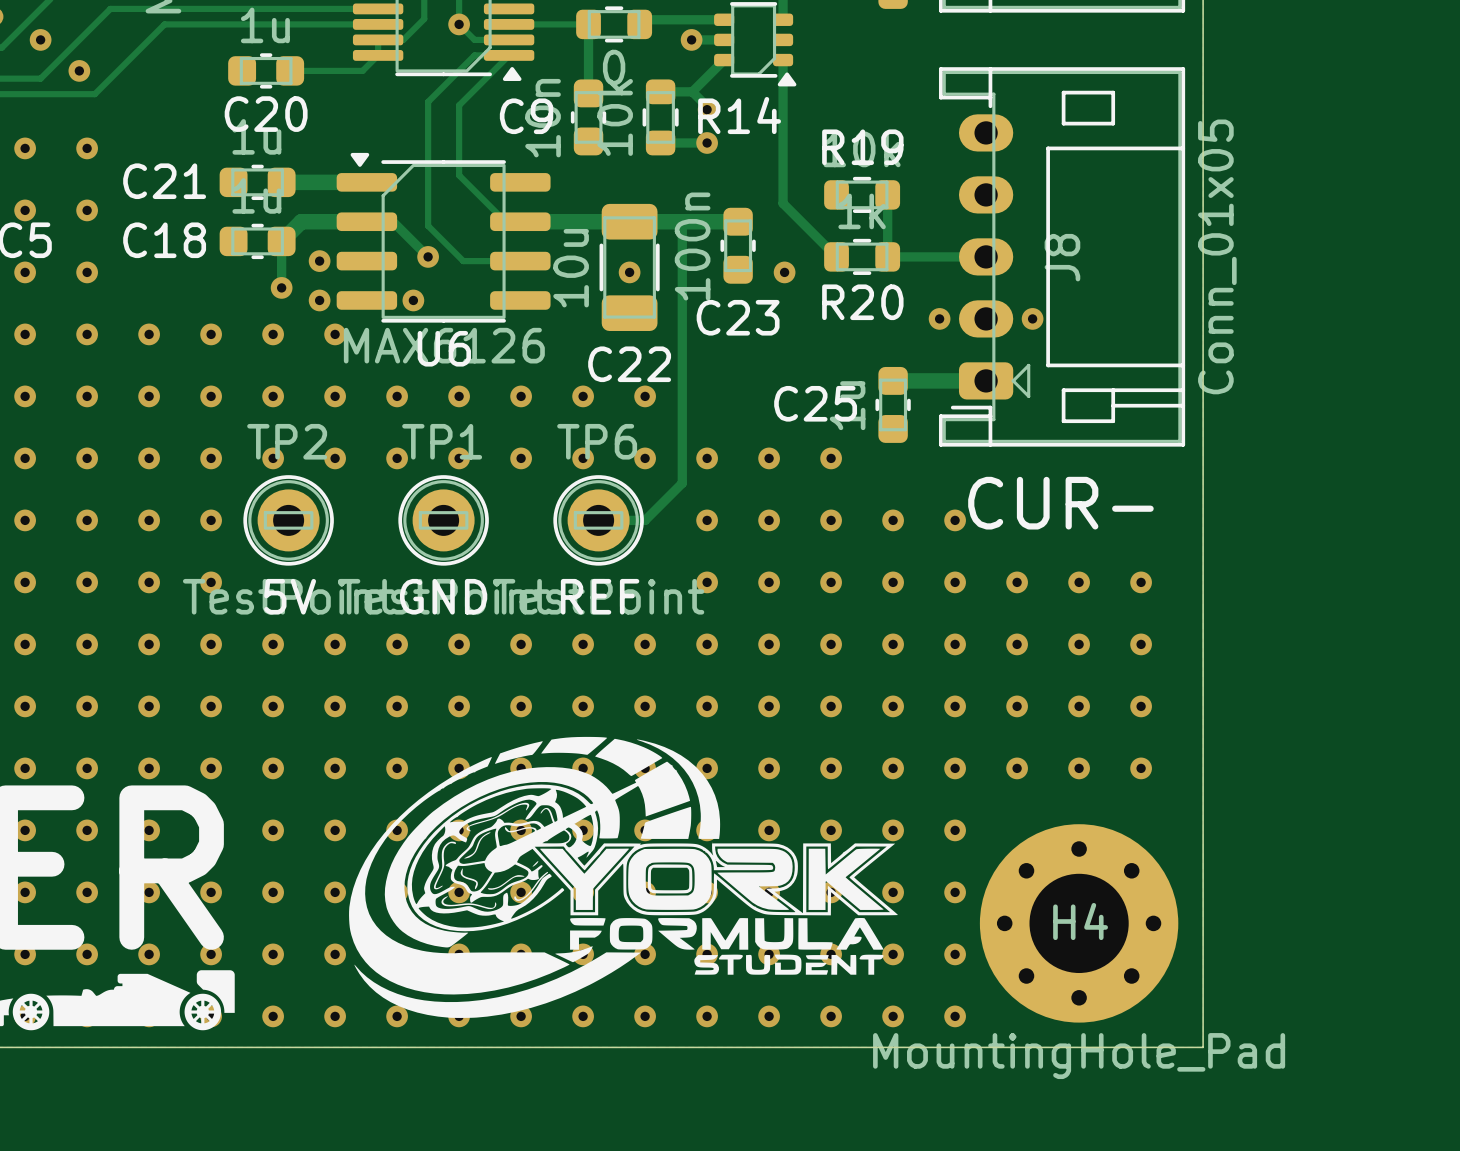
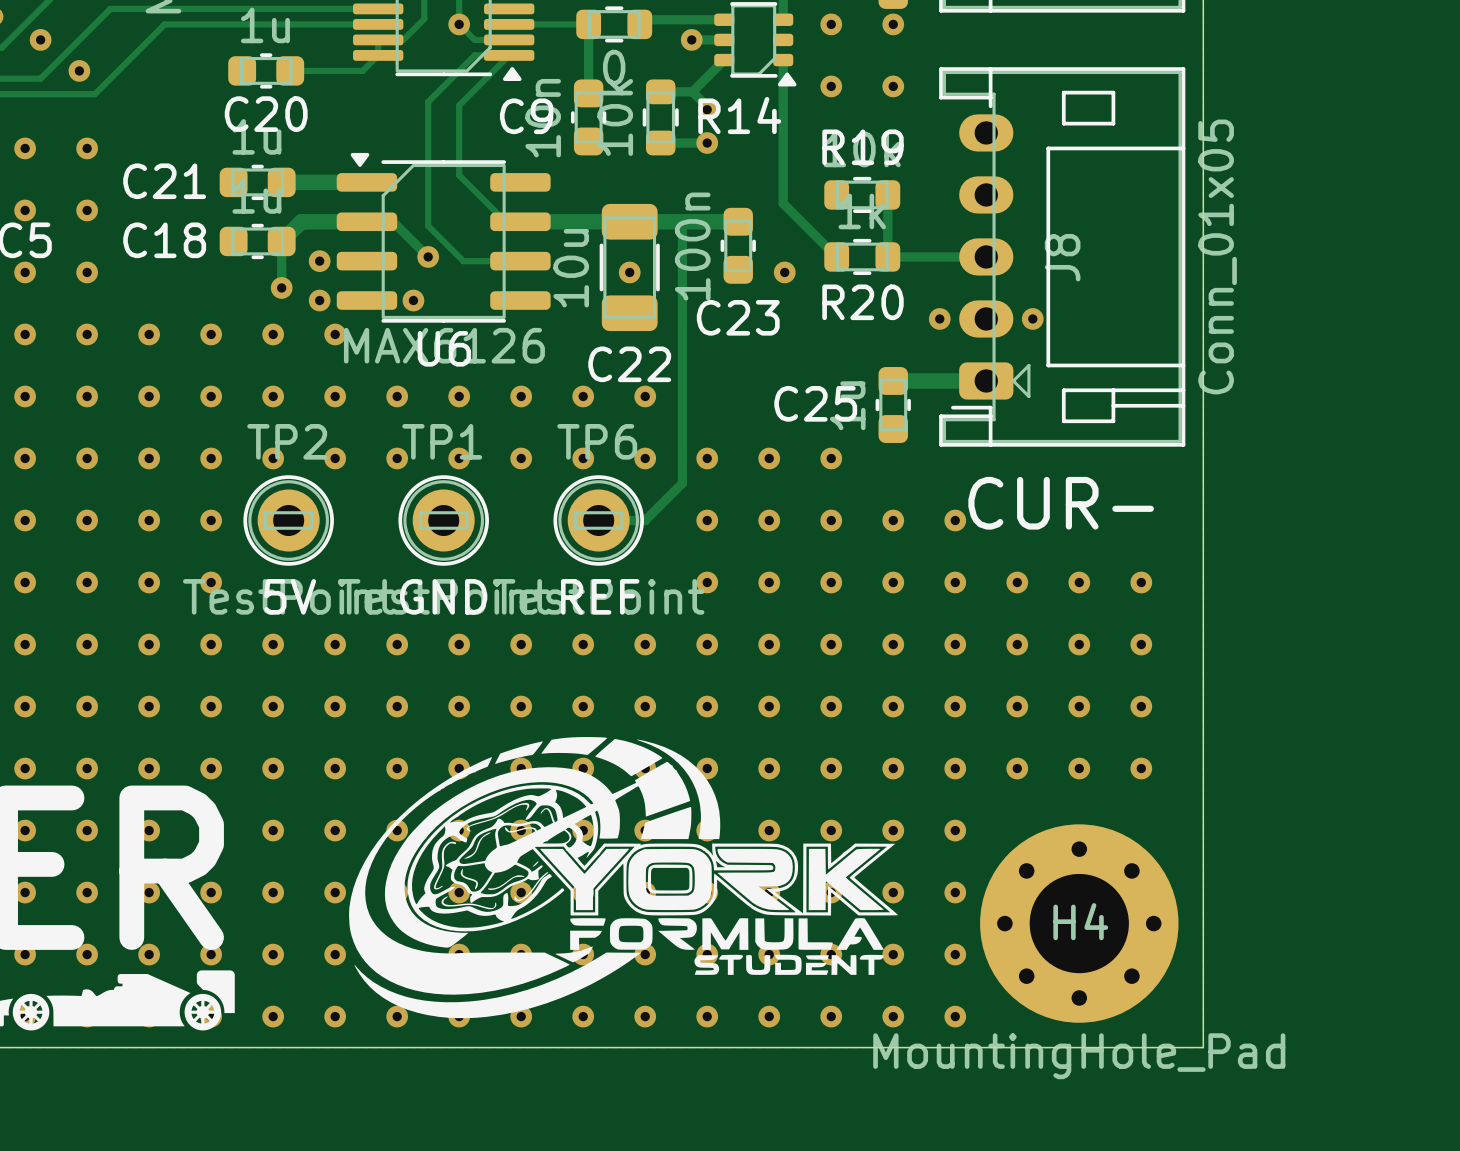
via: none -> (831, 24)
via: none -> (893, 24)
via: none -> (831, 86)
via: none -> (893, 86)

